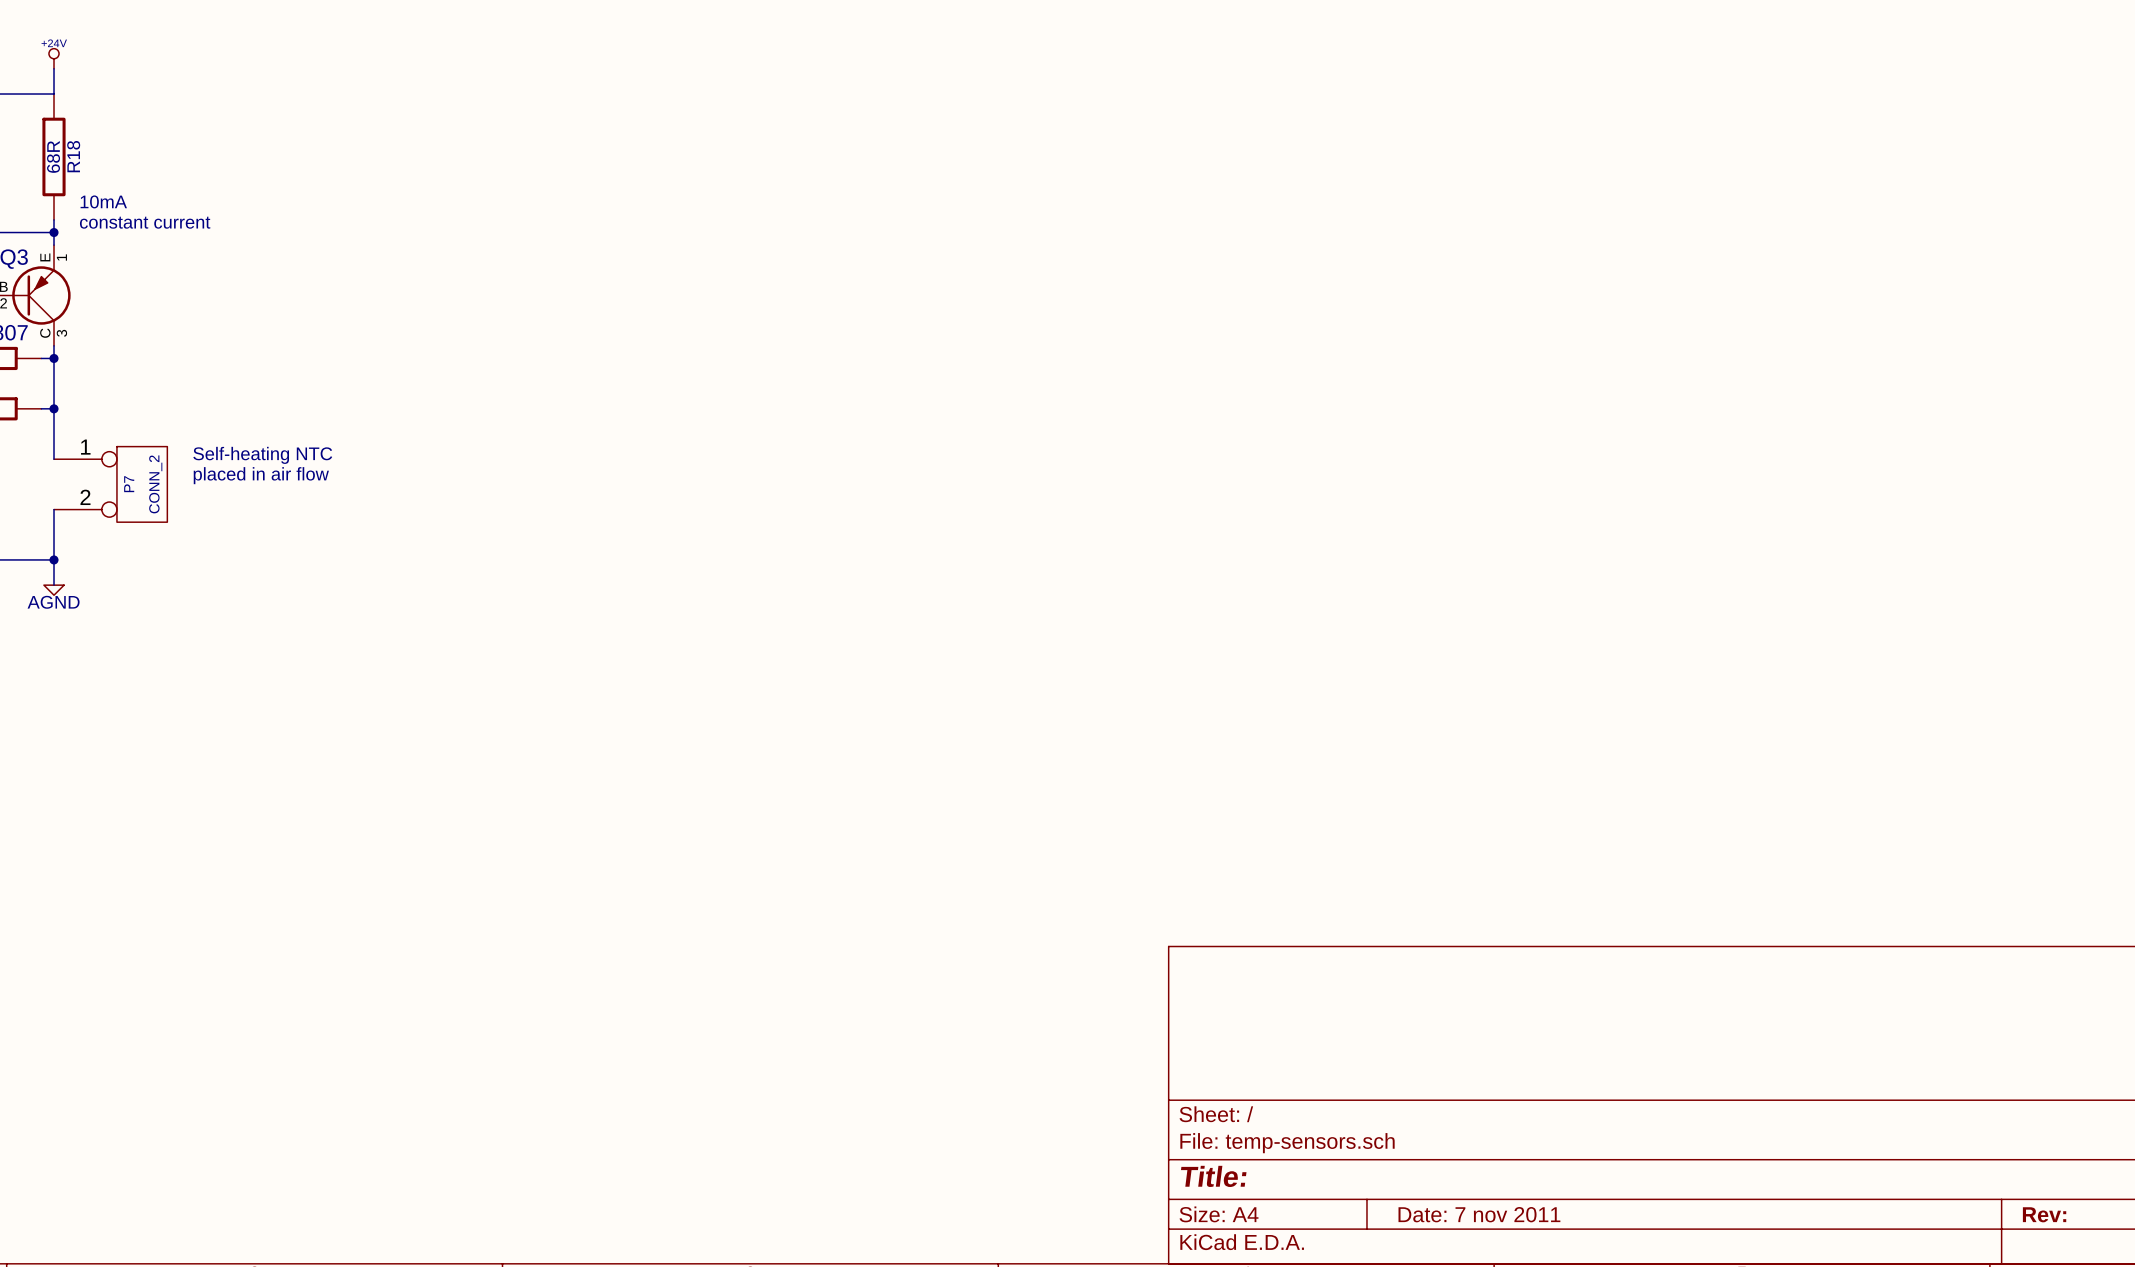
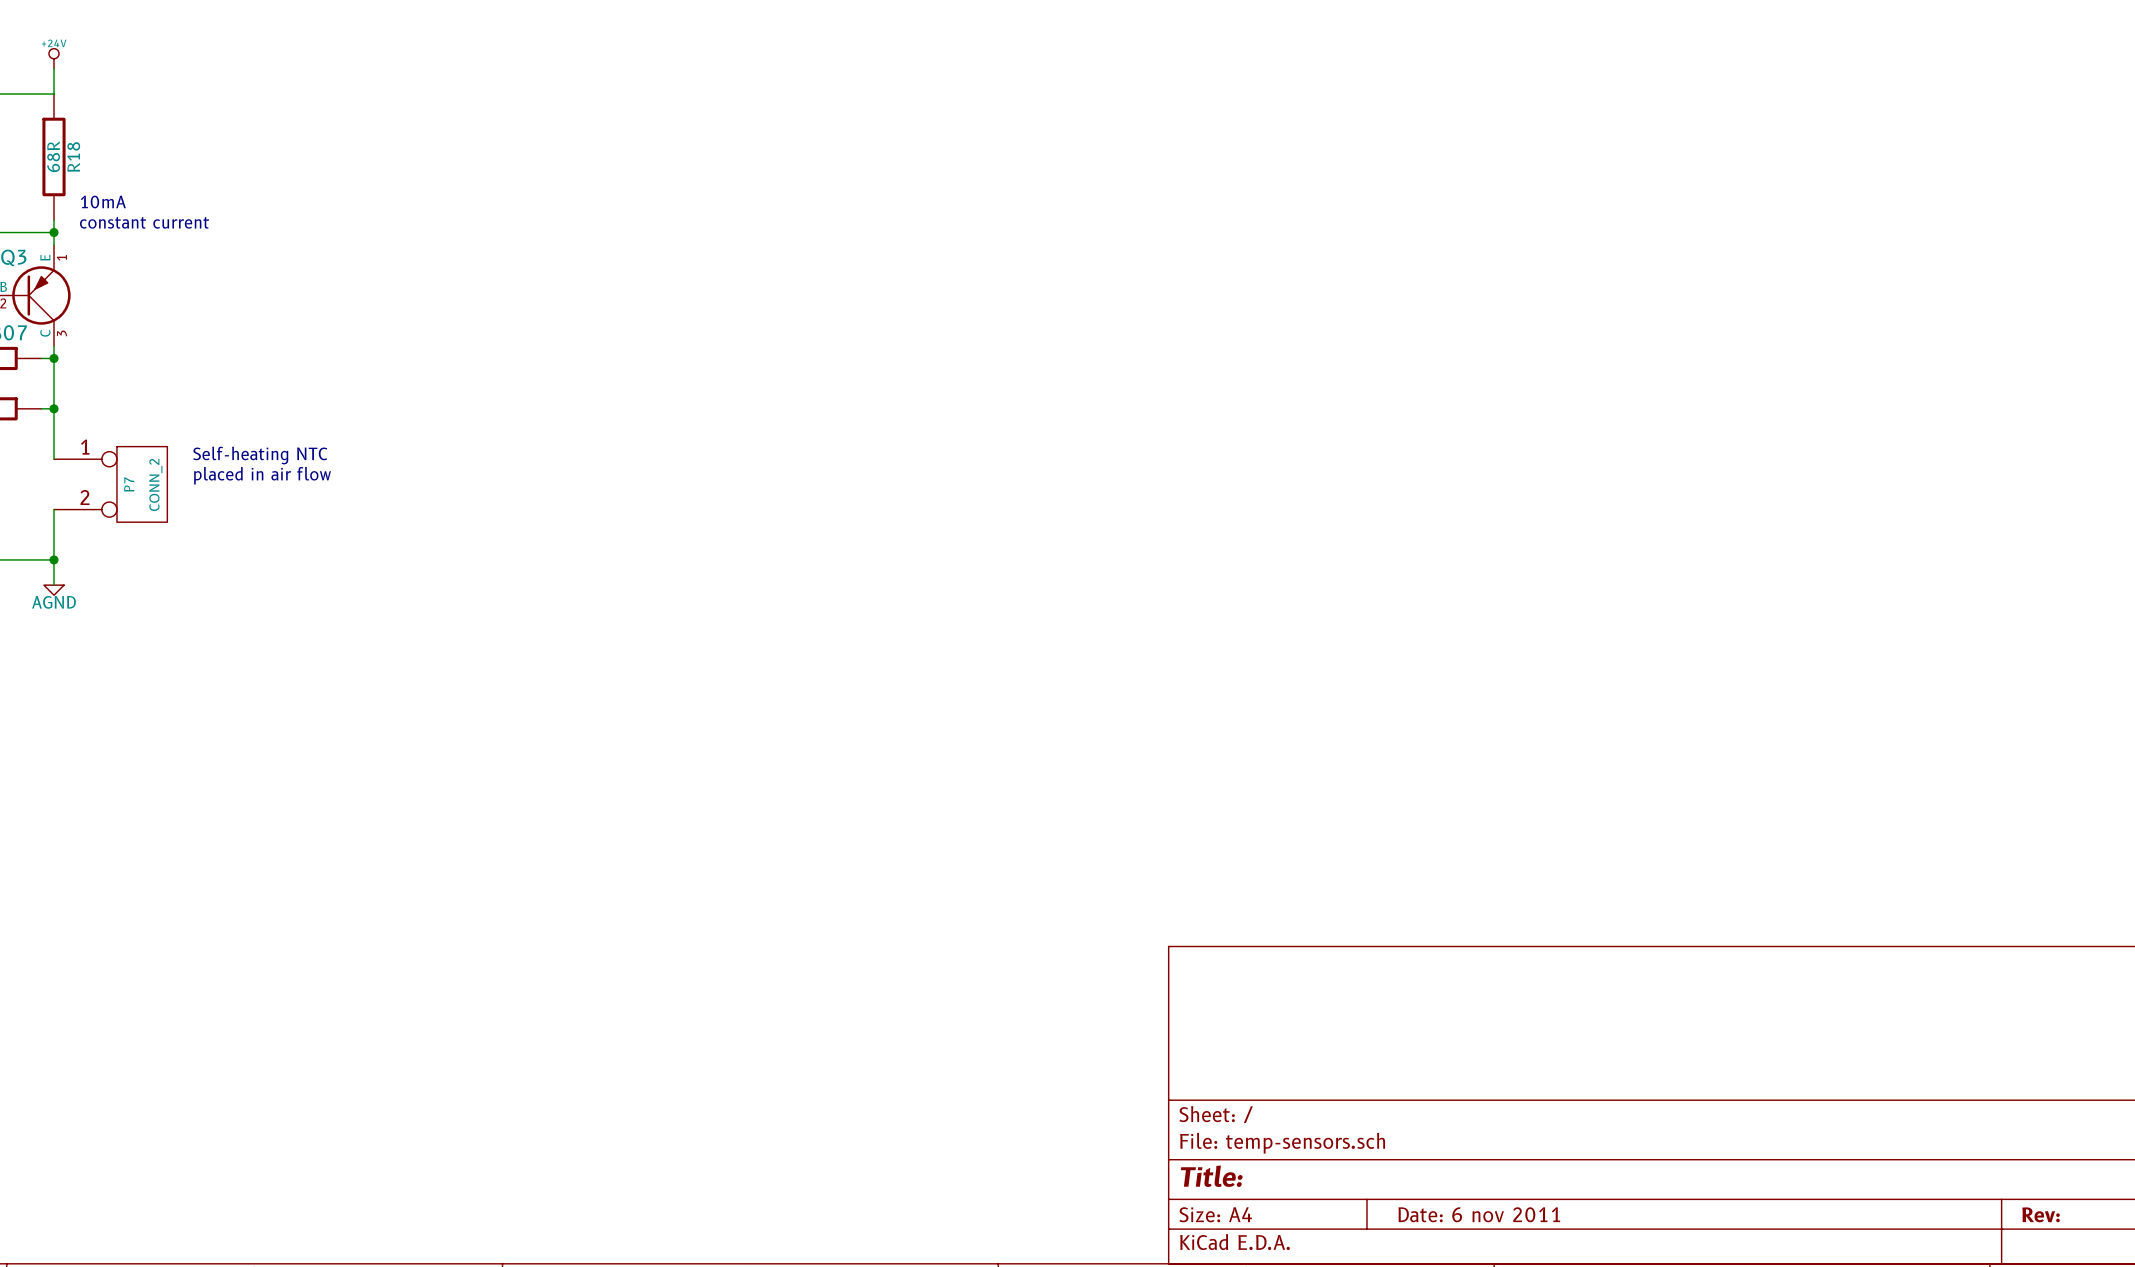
title block: Date: 7 nov 2011 (1479, 1214) -> Date: 6 nov 2011 (1479, 1214)

